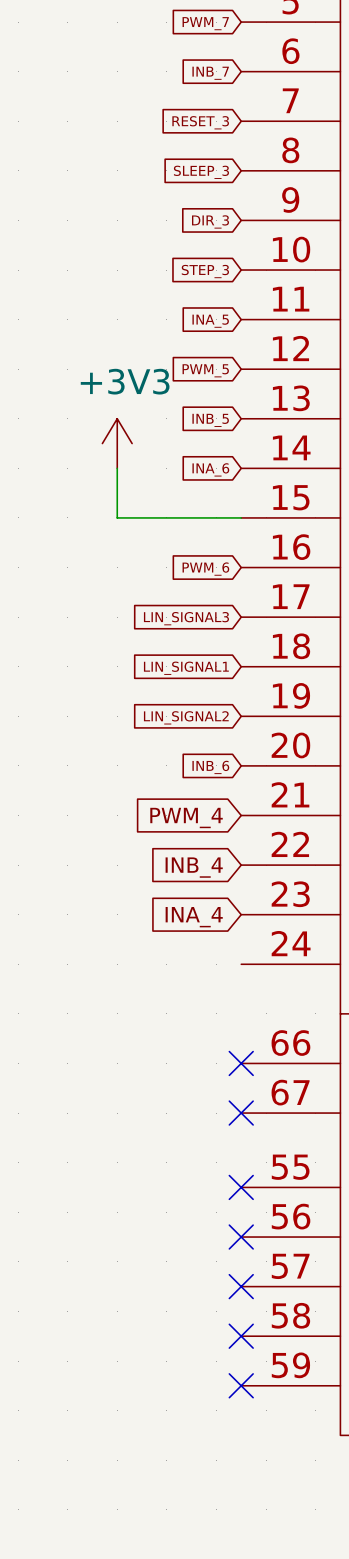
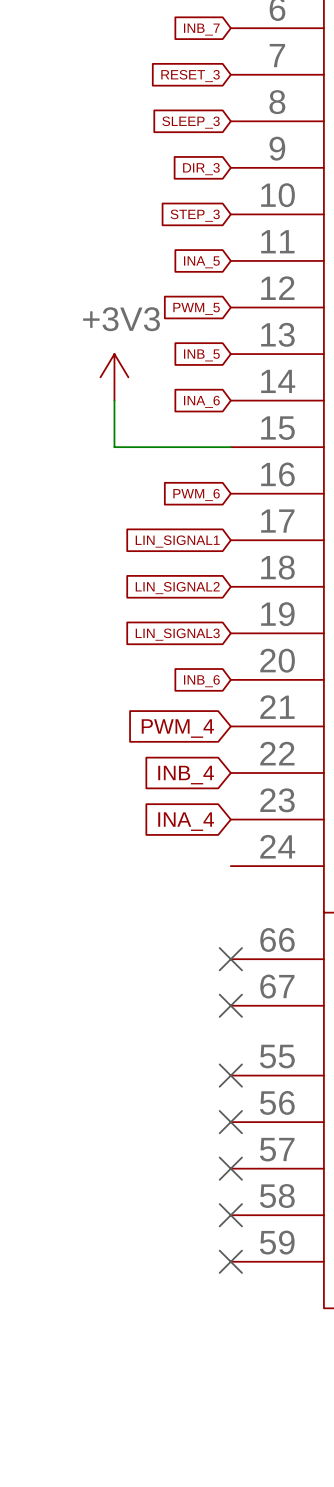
global label: LIN_SIGNAL3 (186, 618) -> LIN_SIGNAL1 (177, 541)
global label: LIN_SIGNAL1 (186, 668) -> LIN_SIGNAL2 (177, 588)
global label: LIN_SIGNAL2 (186, 717) -> LIN_SIGNAL3 (177, 634)

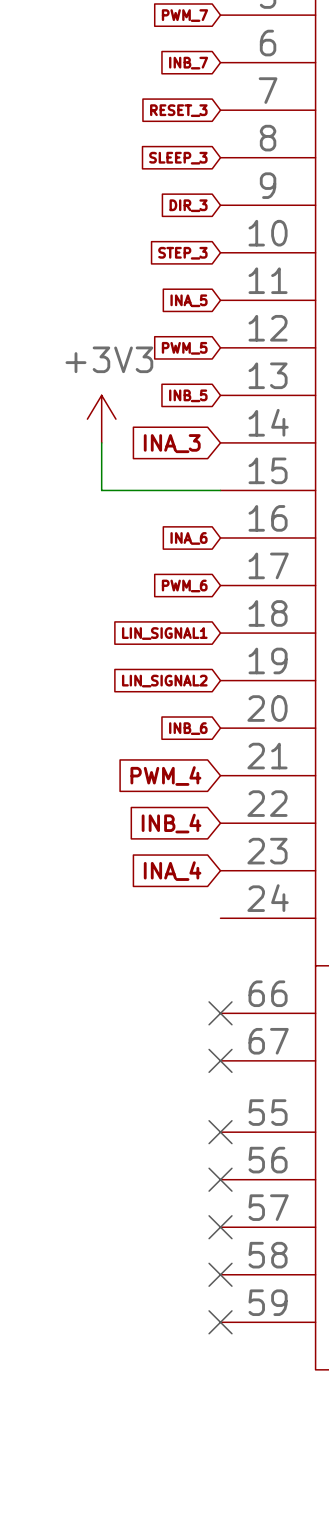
global label: INA_6 (201, 401) -> INA_3 (172, 443)
global label: PWM_6 (196, 494) -> INA_6 (189, 538)
global label: LIN_SIGNAL1 (177, 541) -> PWM_6 (184, 585)
global label: LIN_SIGNAL2 (177, 588) -> LIN_SIGNAL1 (164, 633)
global label: LIN_SIGNAL3 (177, 634) -> LIN_SIGNAL2 (164, 681)

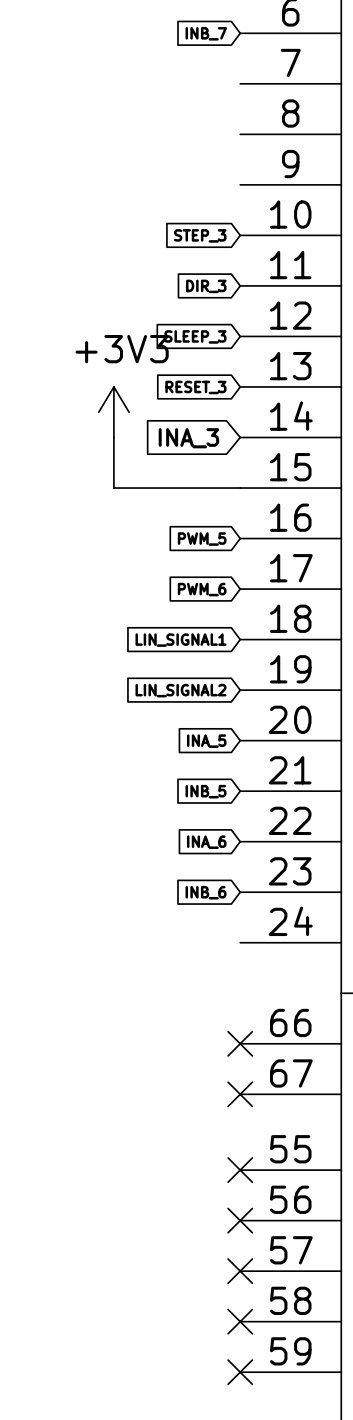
global label: RESET_3 (178, 110) -> none
global label: SLEEP_3 (178, 158) -> none
global label: DIR_3 (188, 205) -> none
global label: INA_5 (189, 300) -> DIR_3 (206, 286)
global label: PWM_5 (184, 348) -> SLEEP_3 (195, 336)
global label: INB_5 (188, 395) -> RESET_3 (195, 387)
global label: INA_6 (189, 538) -> PWM_5 (202, 539)
global label: INB_6 (188, 728) -> INA_5 (206, 741)
global label: PWM_4 (165, 776) -> INB_5 (206, 791)
global label: INB_4 (171, 823) -> INA_6 (206, 842)
global label: INA_4 (172, 871) -> INB_6 (206, 892)

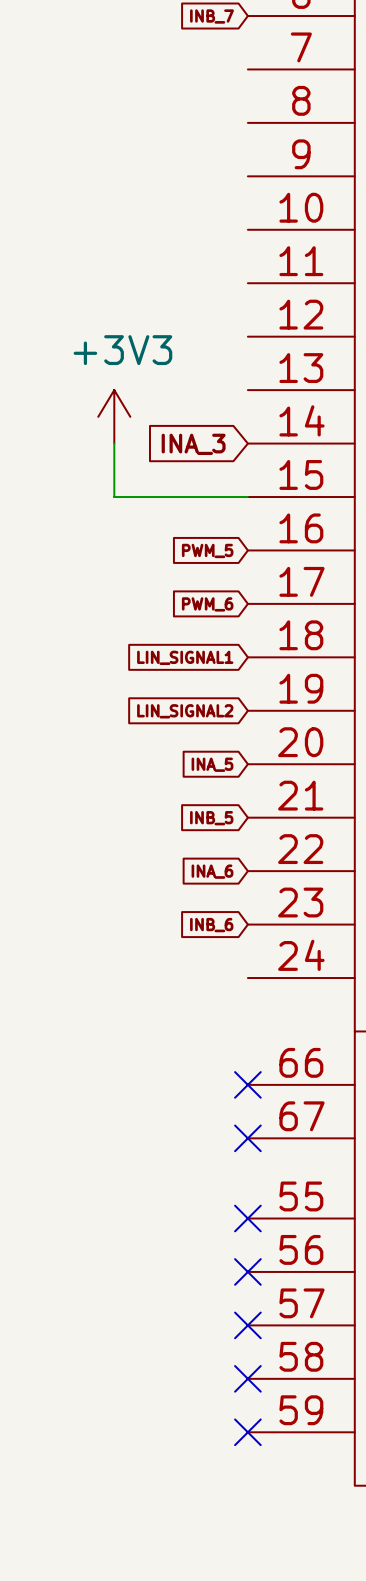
global label: STEP_3 (200, 235) -> none
global label: DIR_3 (206, 286) -> none
global label: SLEEP_3 (195, 336) -> none
global label: RESET_3 (195, 387) -> none

